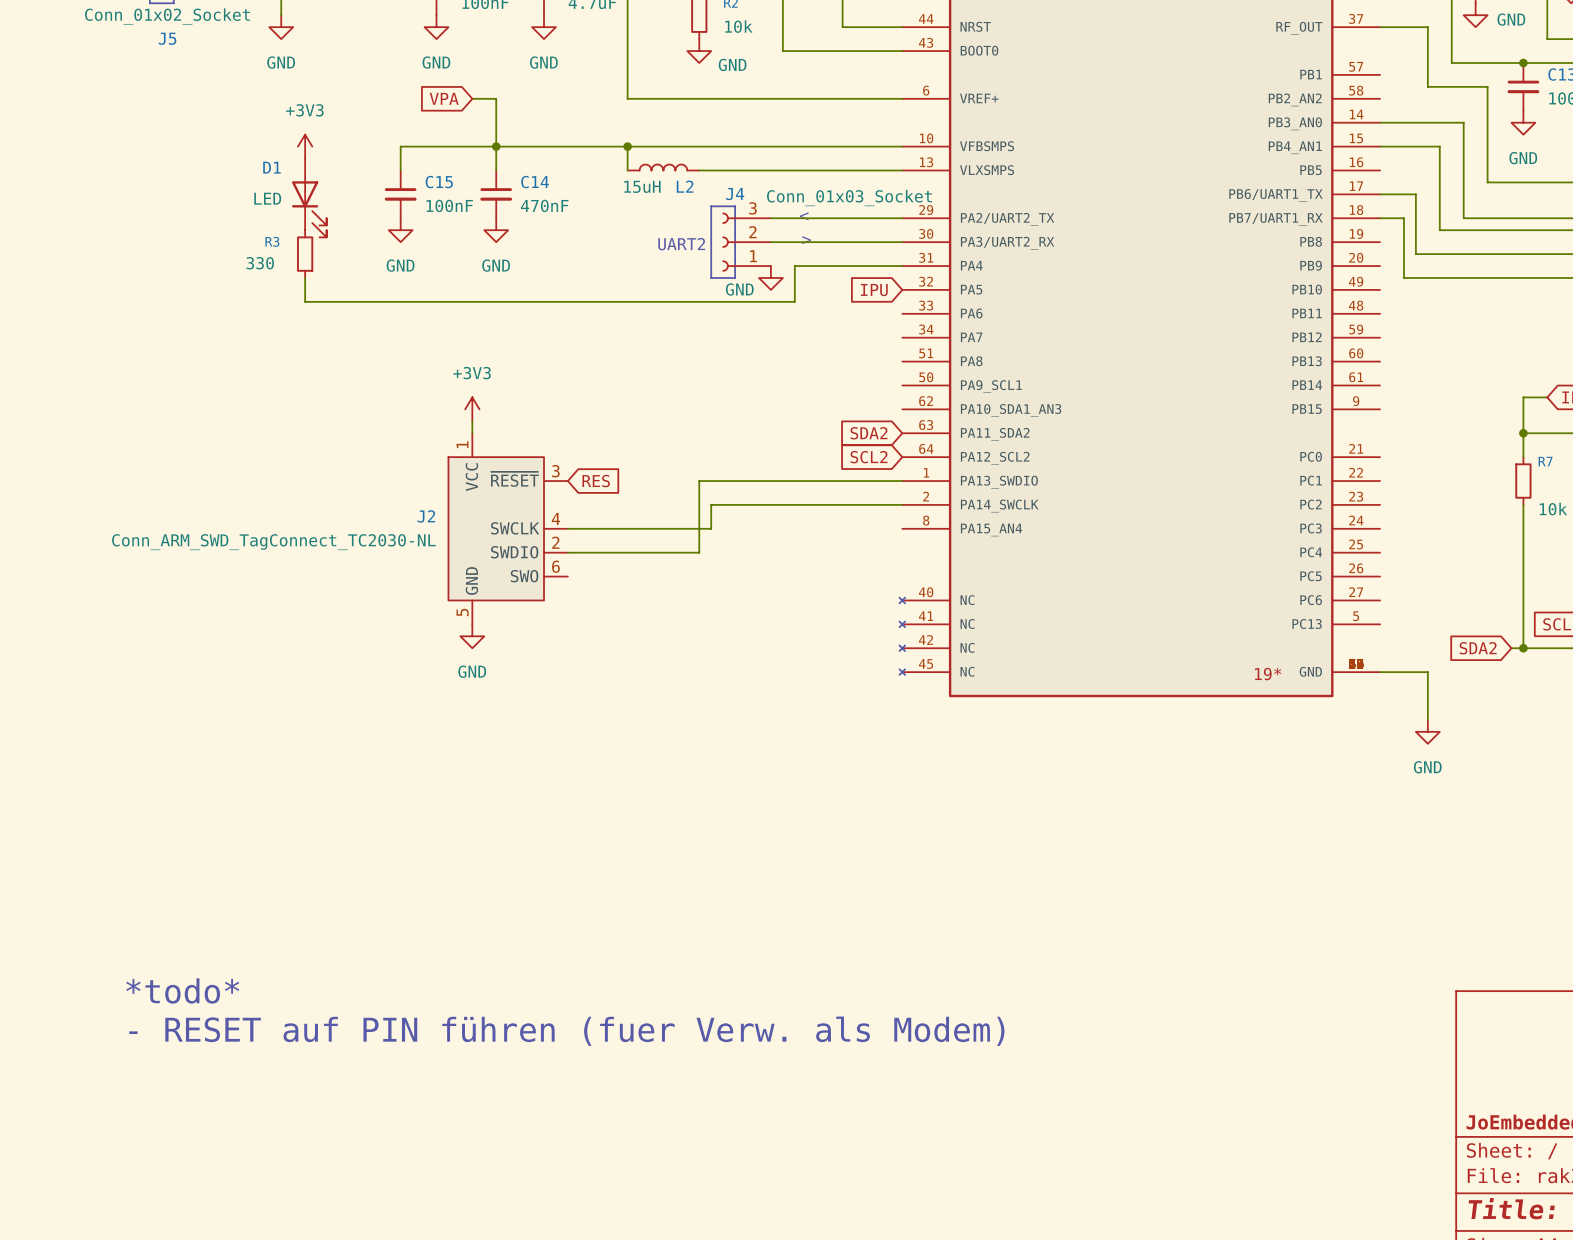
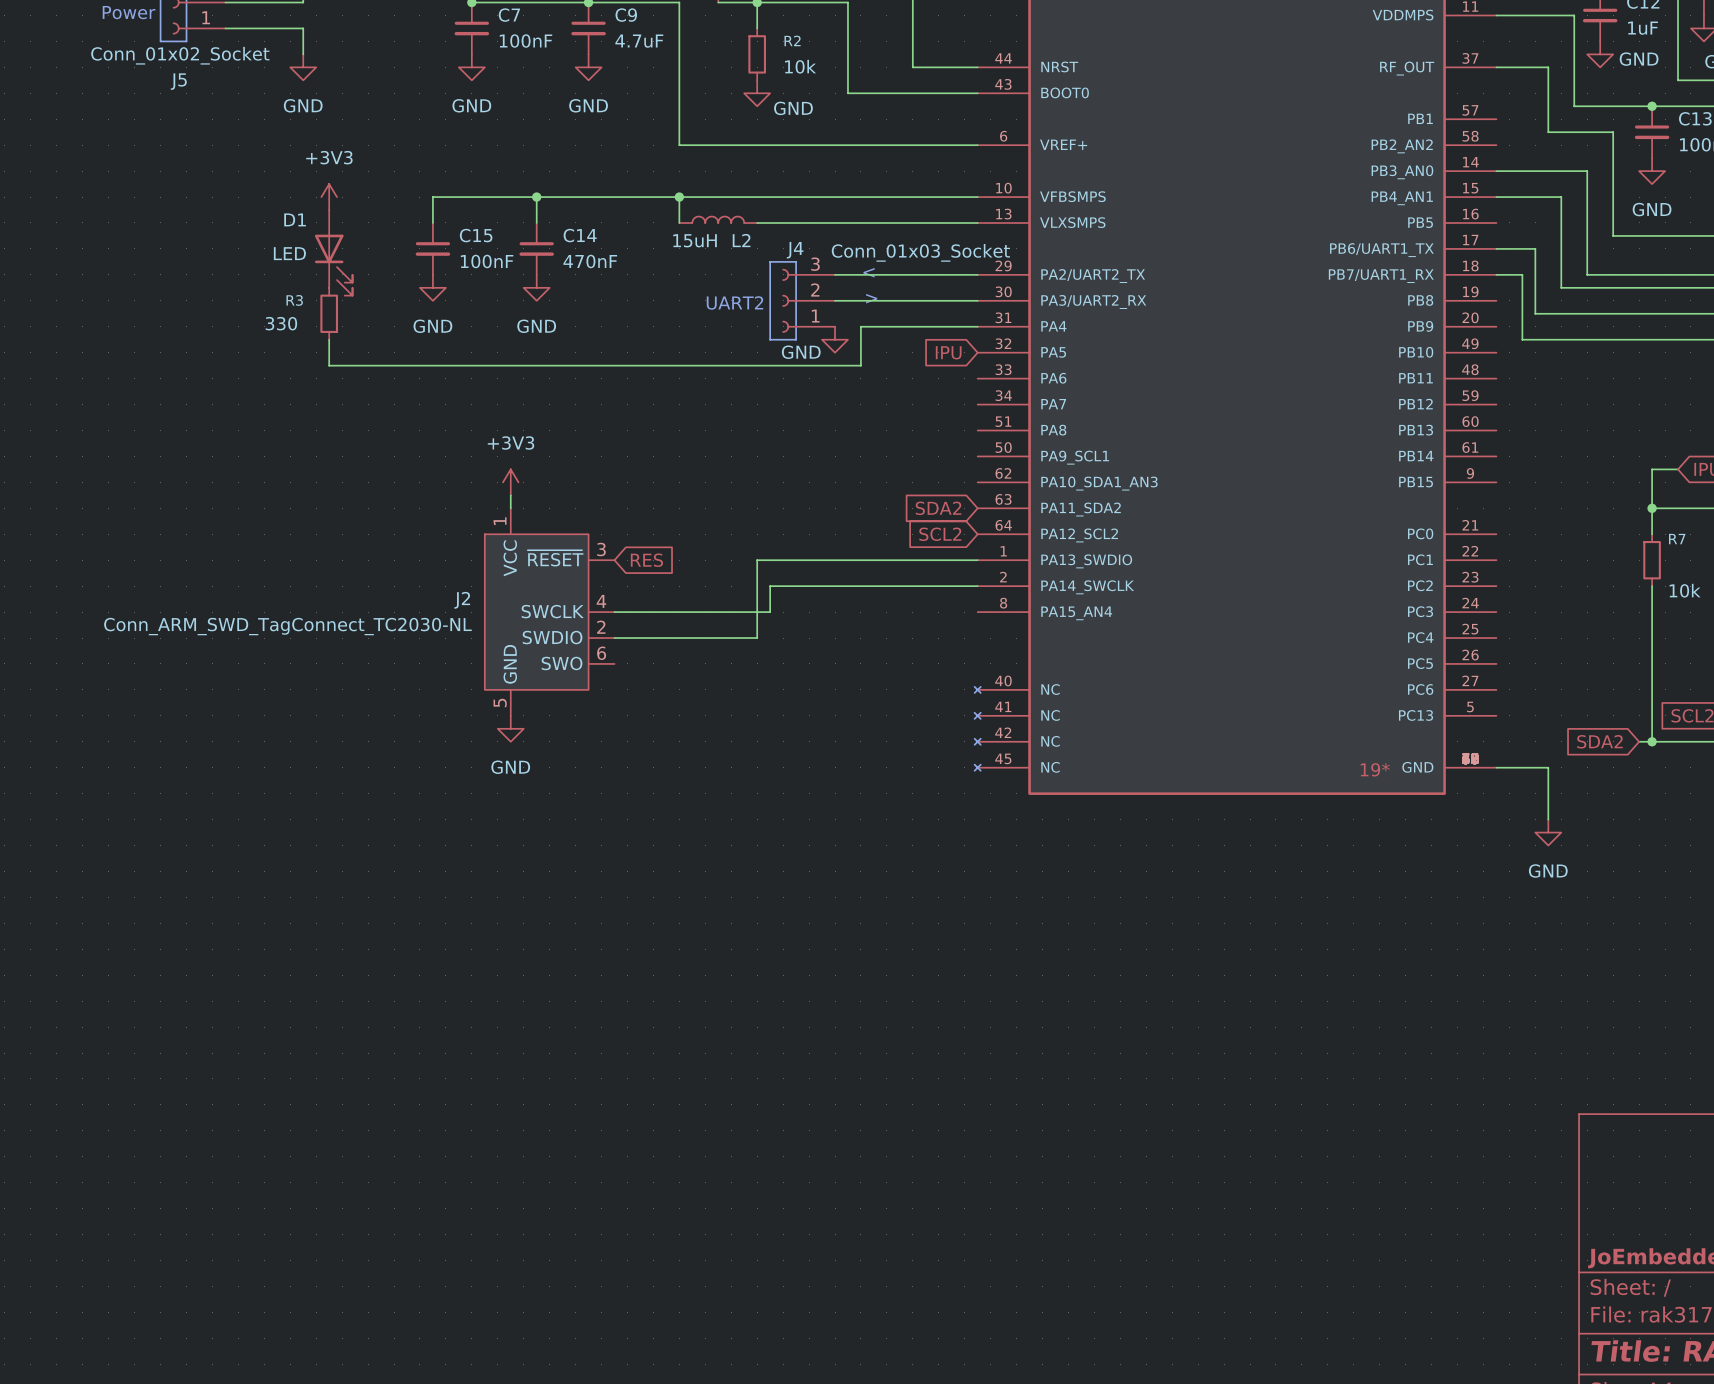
global label: VPA (444, 98) -> none
wire: (472, 98) (496, 98) (496, 146) -> none
text: *todo* (182, 990) -> none
text: - RESET auf PIN führen (fuer Verw. als Modem) (566, 1031) -> none

